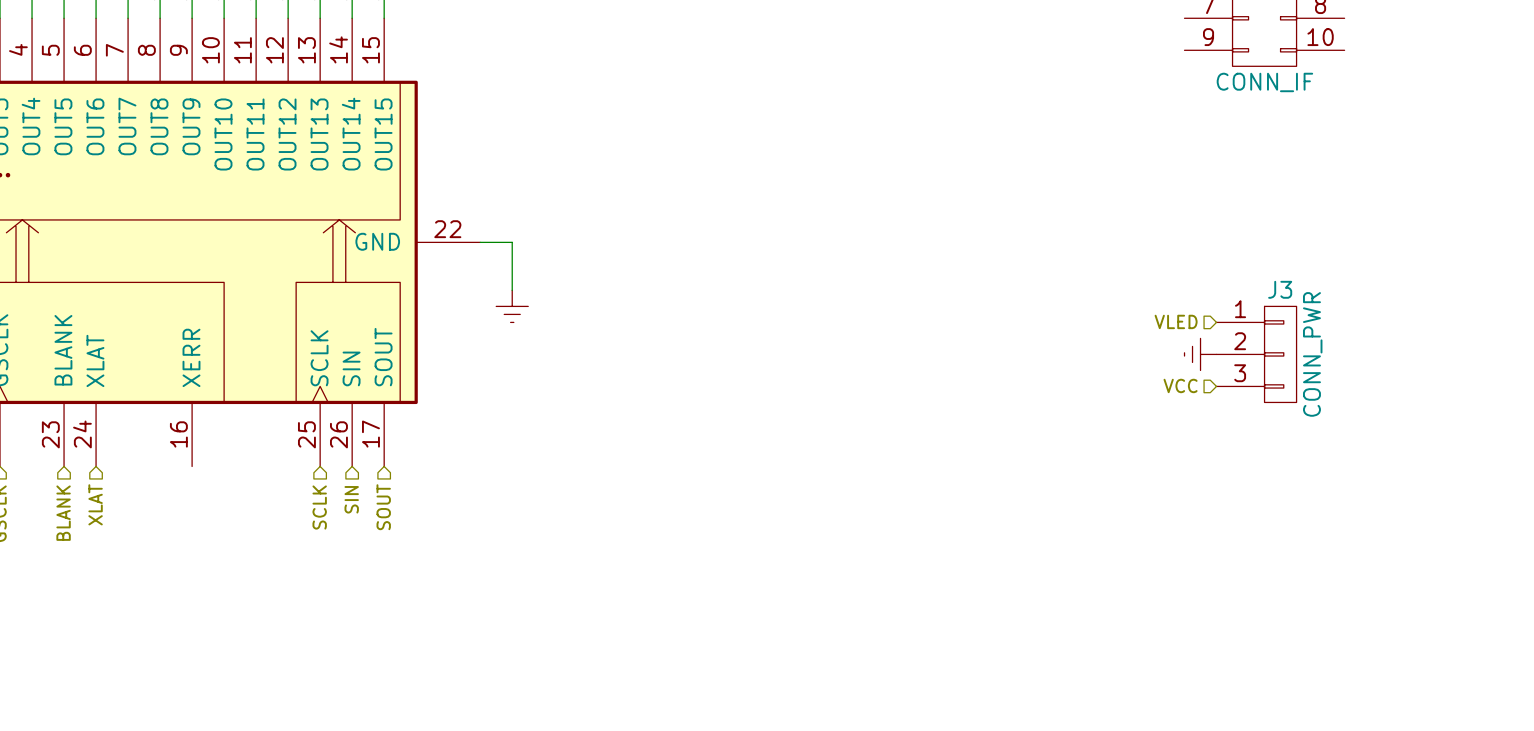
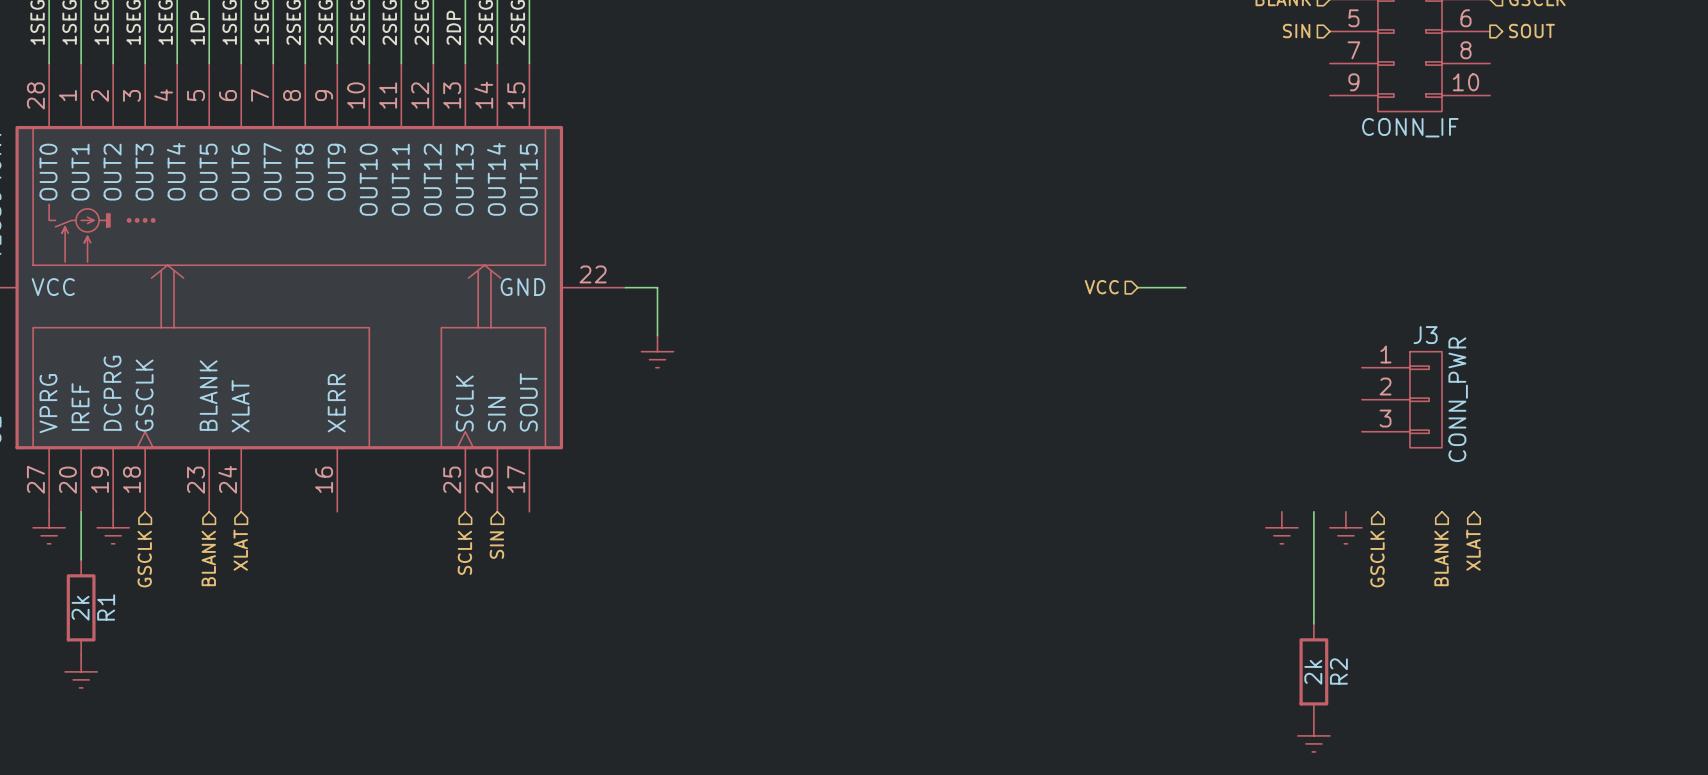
wire: none -> (1137, 287) (1185, 287)
hierarchical label: VLED (1176, 321) -> none
power symbol: (1200, 354) -> none
hierarchical label position: VCC (1180, 385) -> VCC (1101, 287)
wire: none -> (1313, 511) (1313, 623)
power symbol: none -> (1281, 527)
power symbol: none -> (1345, 527)
hierarchical label: none -> XLAT (1473, 550)
hierarchical label: SOUT (383, 507) -> none
hierarchical label: none -> GSCLK (1377, 559)
hierarchical label: none -> BLANK (1441, 558)
R2: none -> 2k (1313, 671)
power symbol: none -> (1313, 735)

